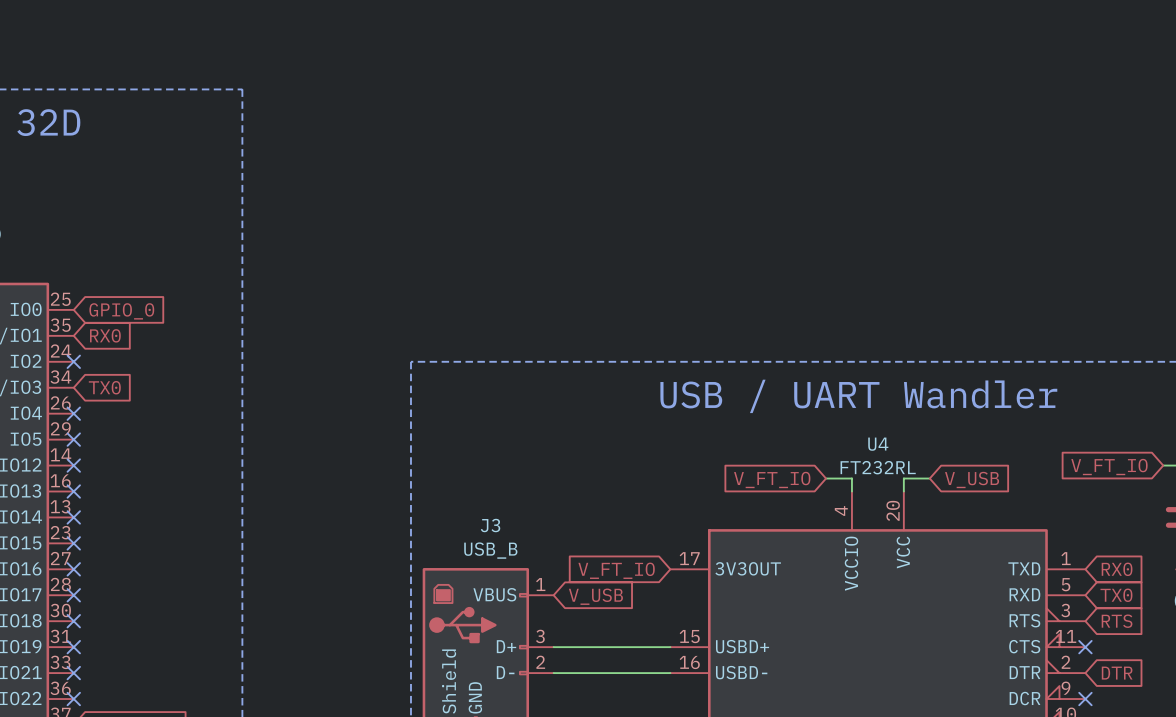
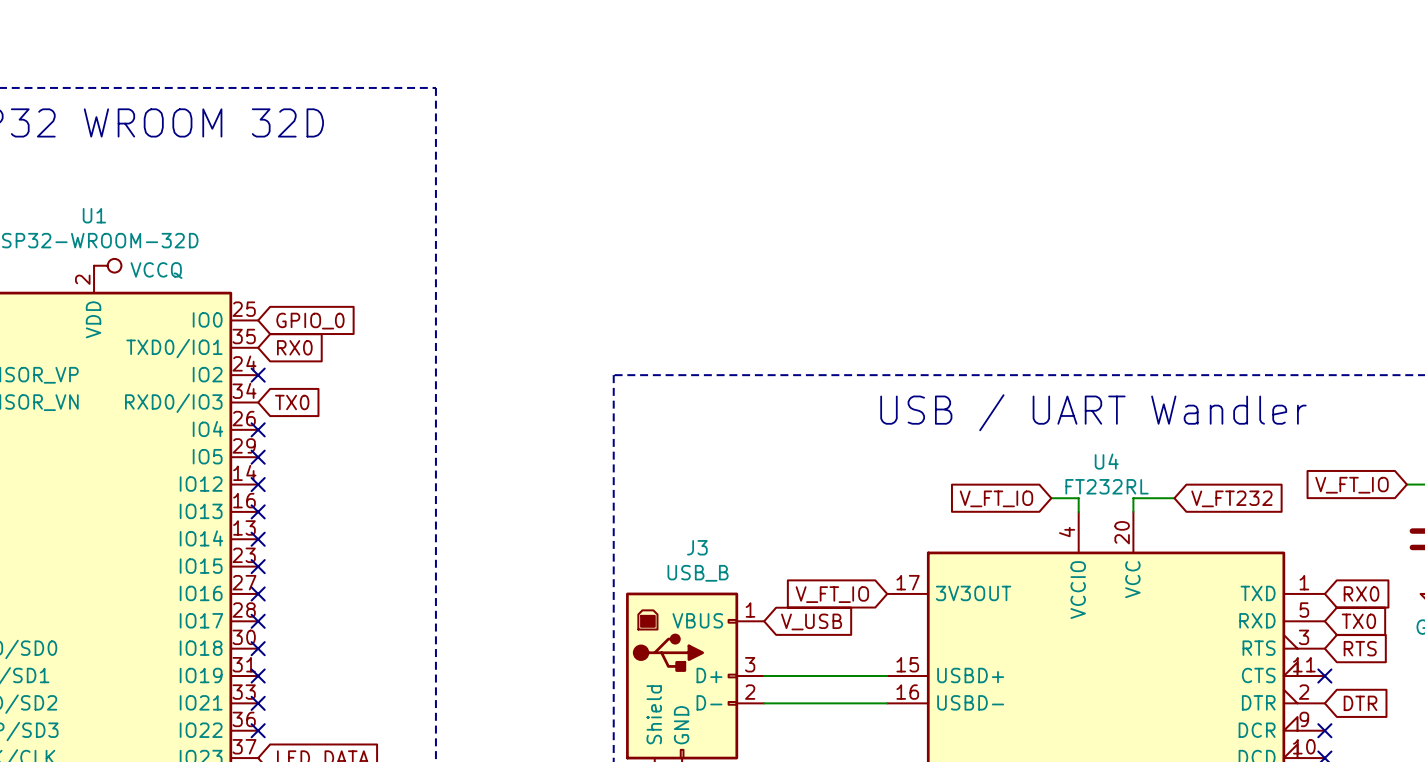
wire: none -> (1160, 498) (1174, 498)
global label: V_USB (972, 479) -> none
global label: none -> V_FT232 (1231, 498)

